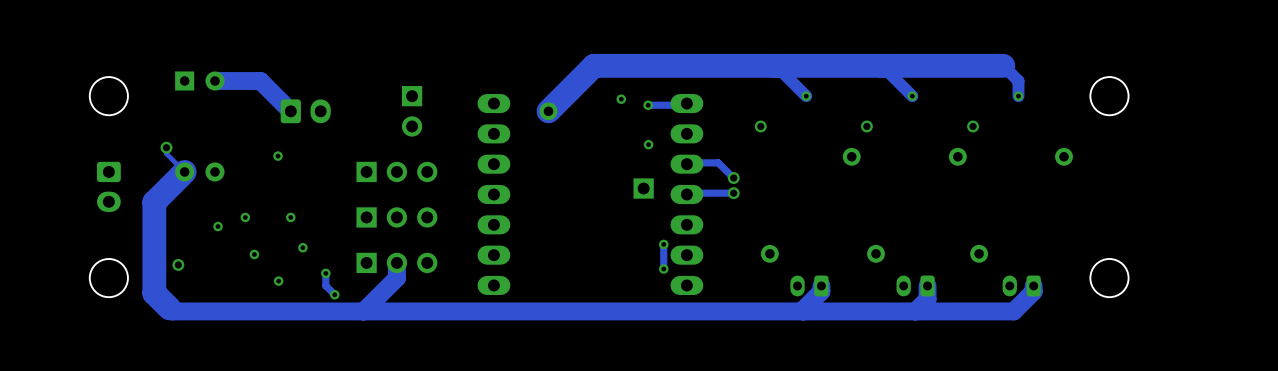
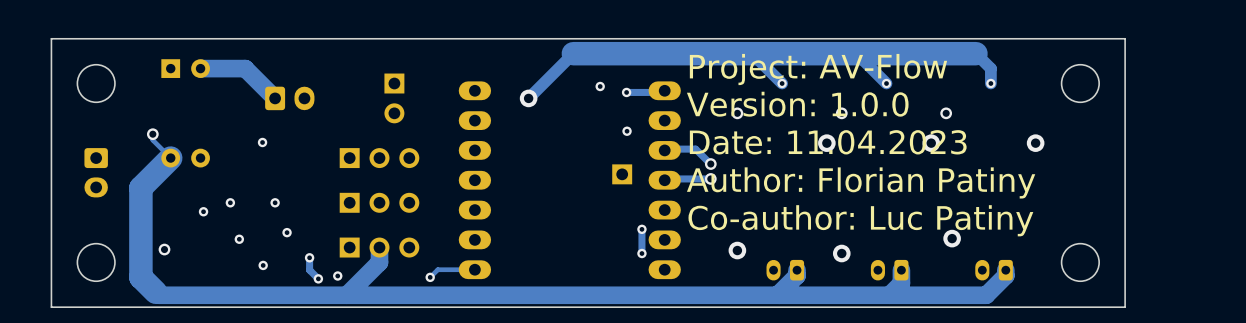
board edge: none -> (1125, 38) (51, 38) (51, 307) (1125, 307) (1125, 38)
track width: thick (594, 65) (548, 111) -> thin (573, 53) (528, 98)
text: none -> Project: AV-Flow (818, 69)
text: none -> Version: 1.0.0 (797, 104)
text: none -> Date: 11.04.2023 (828, 142)
text: none -> Author: Florian Patiny (861, 182)
text: none -> Co-author: Luc Patiny (860, 220)
via position: (769, 253) -> (737, 250)
via position: (876, 253) -> (841, 253)
track: none -> (474, 269) (437, 269) (430, 277)
via: none -> (337, 275)
via: none -> (430, 277)

